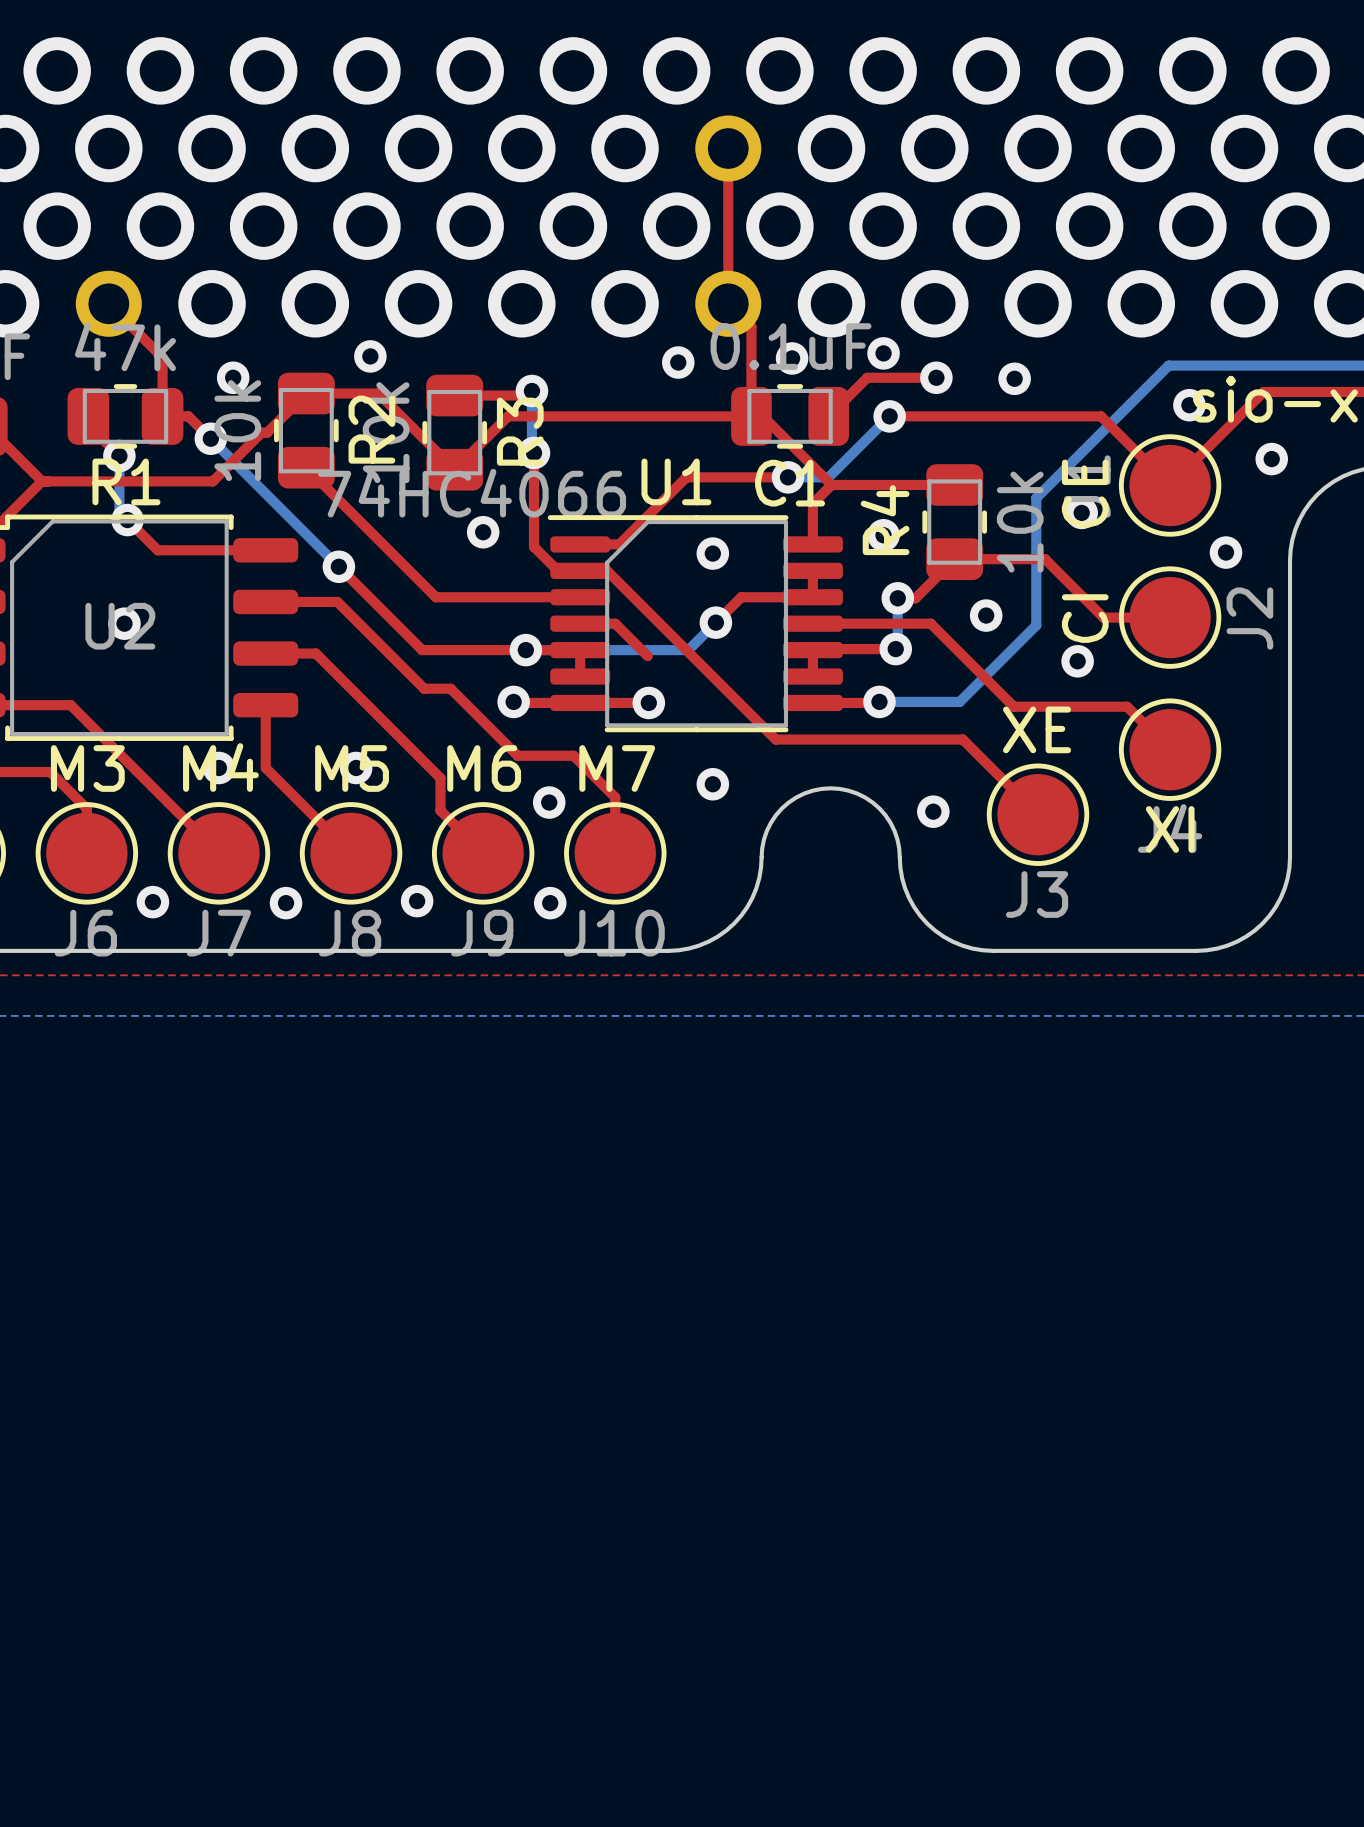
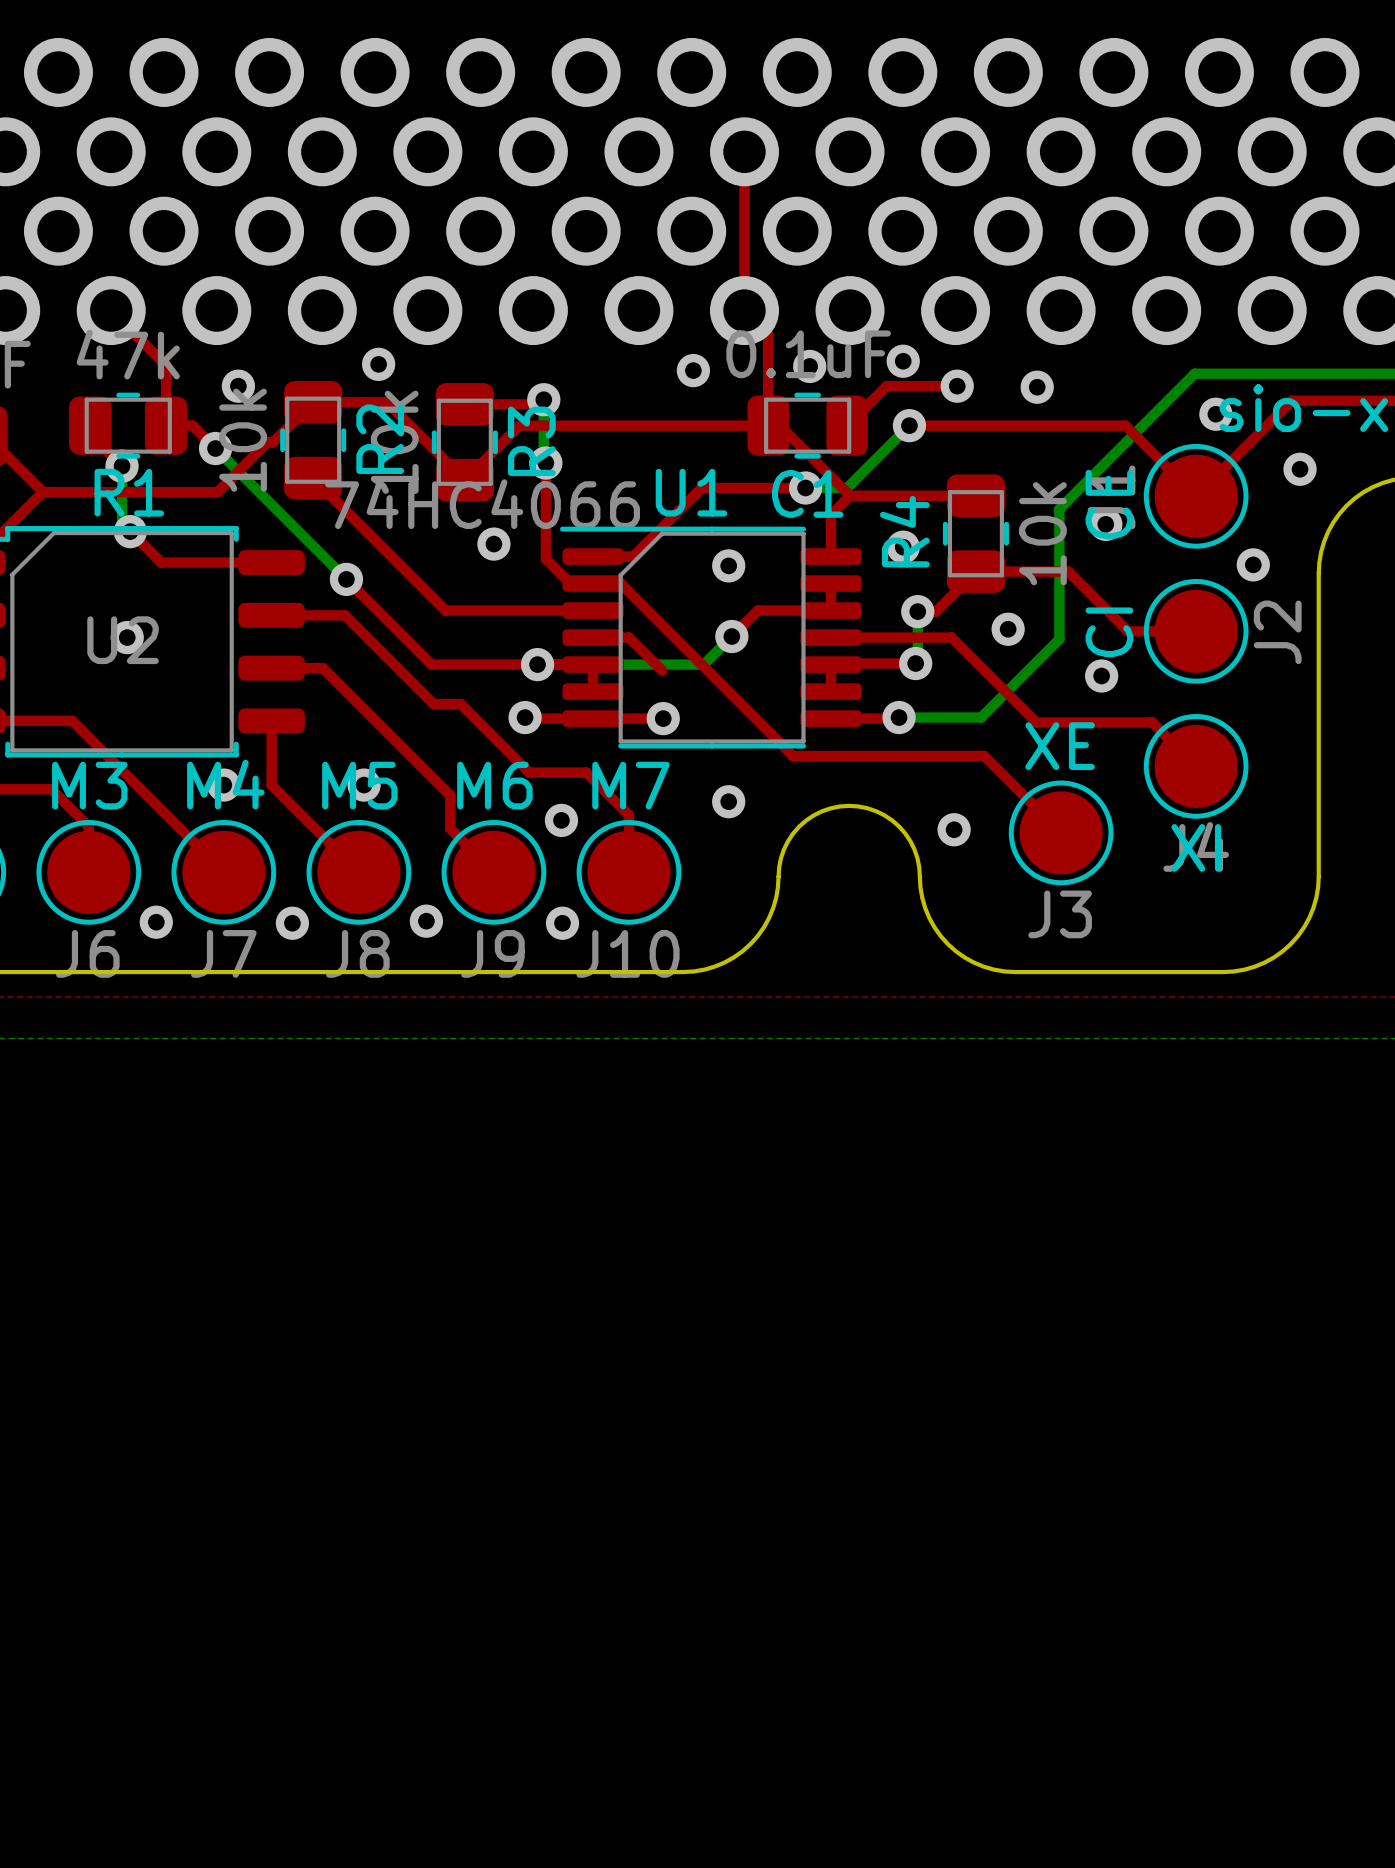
part: (728, 148) -> none
via: none -> (744, 151)
part: (108, 303) -> none
via: none -> (111, 310)
part: (728, 303) -> none
via: none -> (744, 310)

